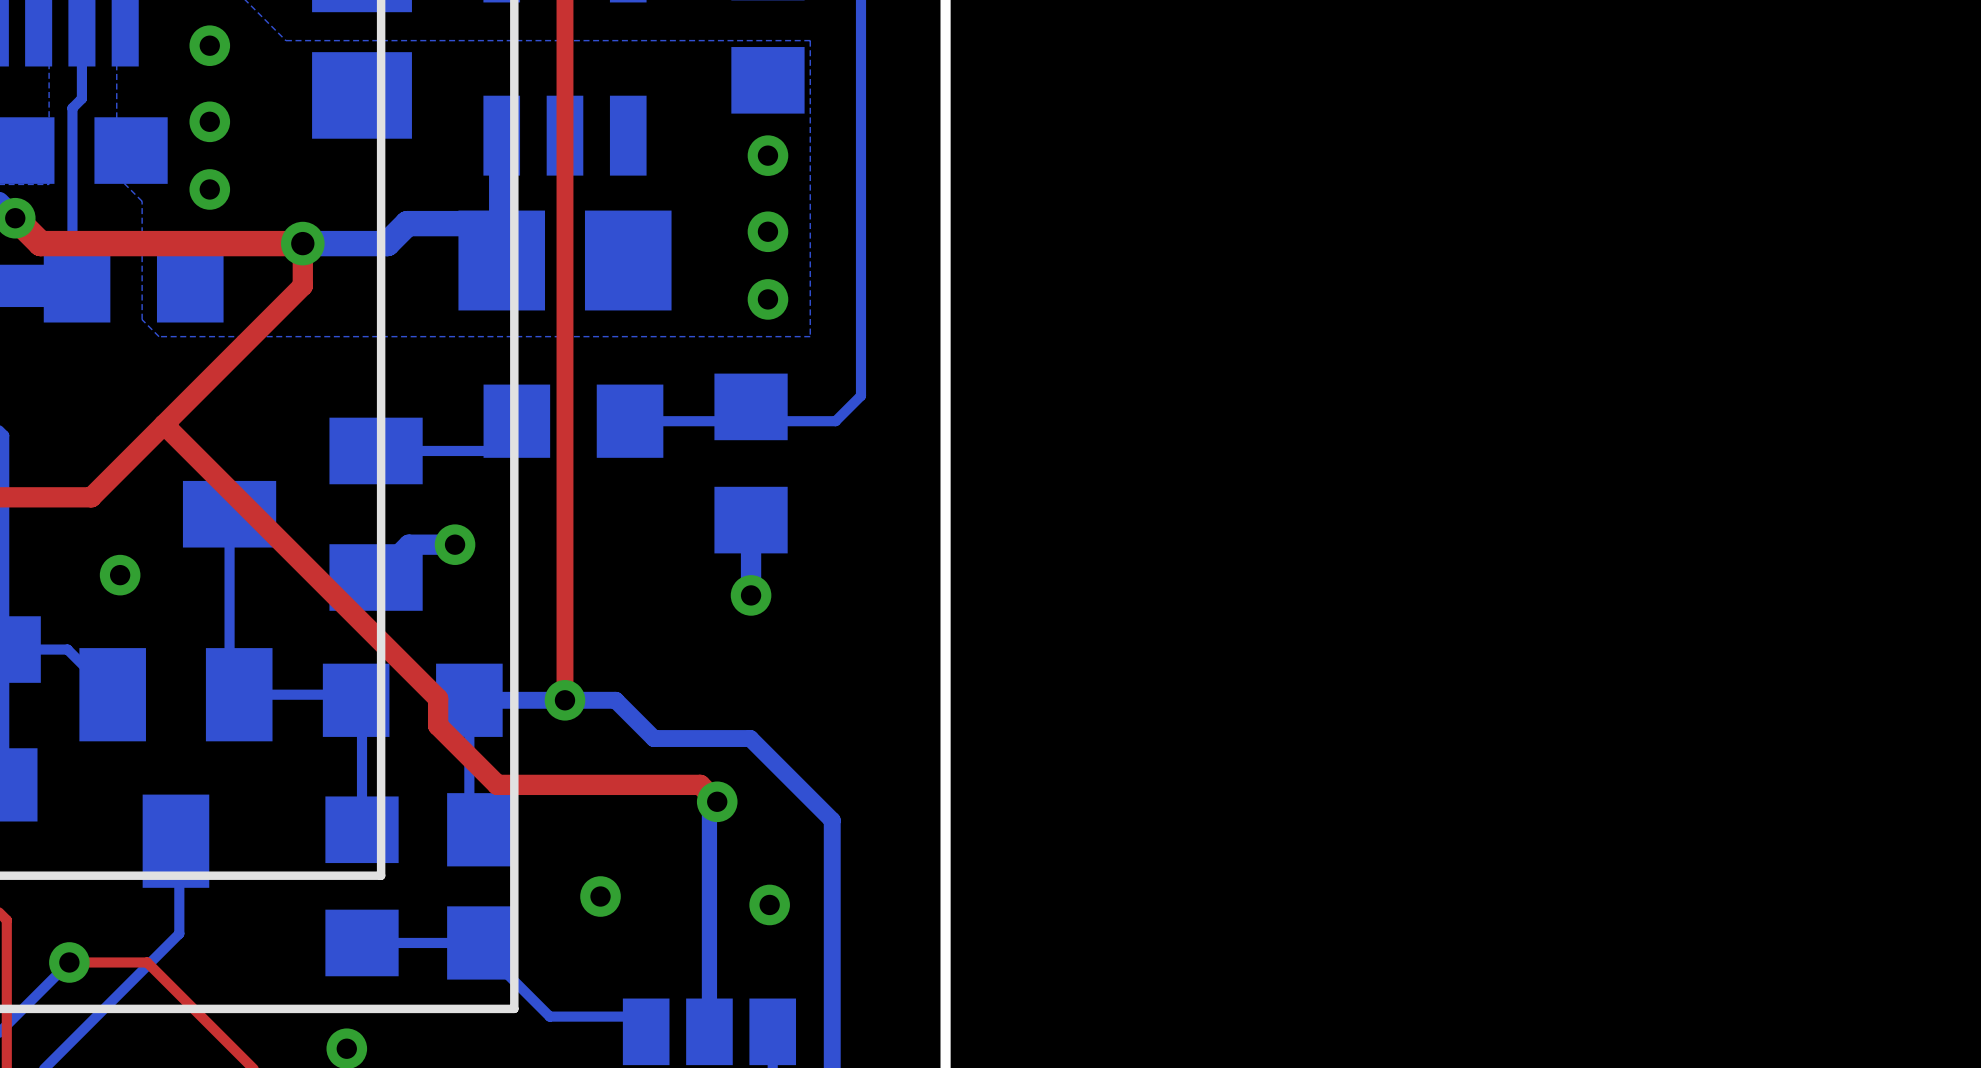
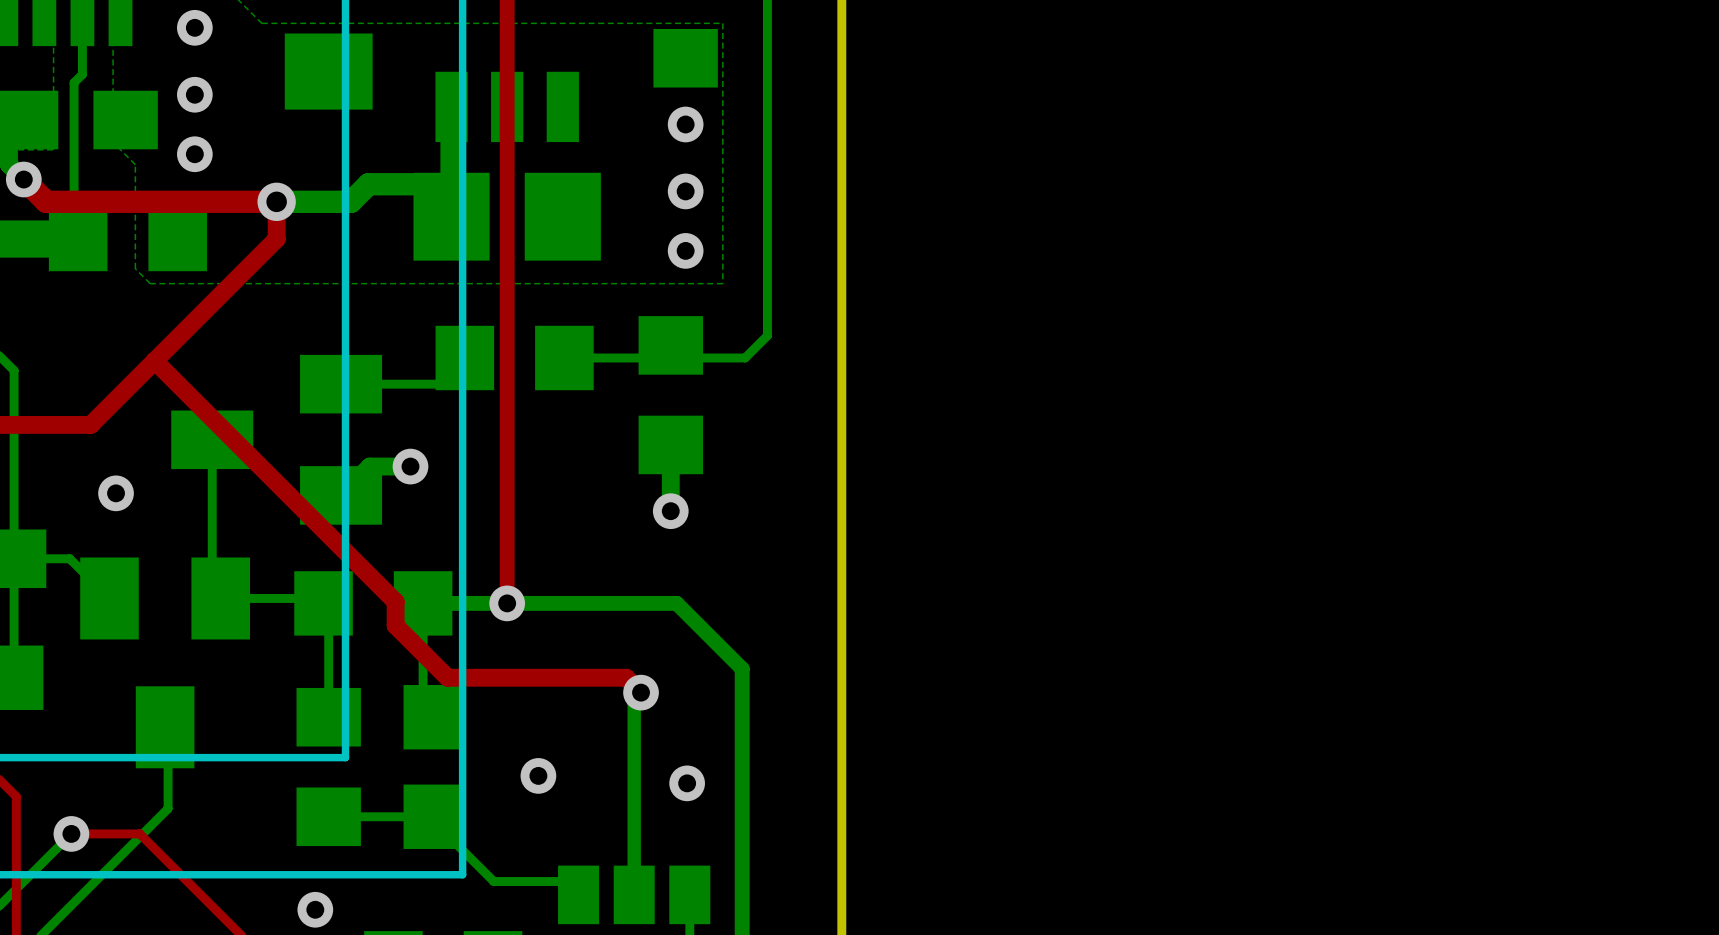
bottom track: (615, 700) (653, 738) (750, 738) (832, 820) -> (551, 603) (676, 603) (742, 668) (742, 708)

